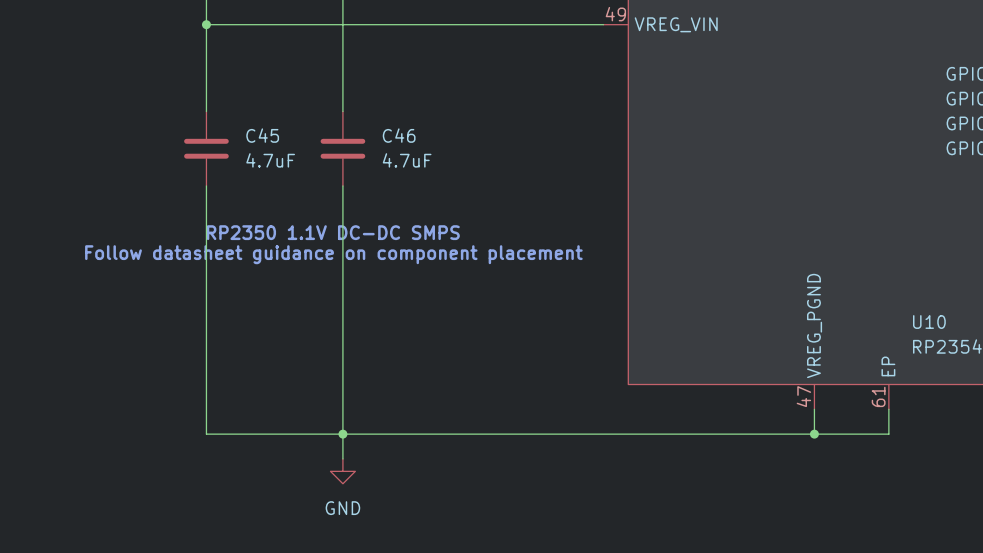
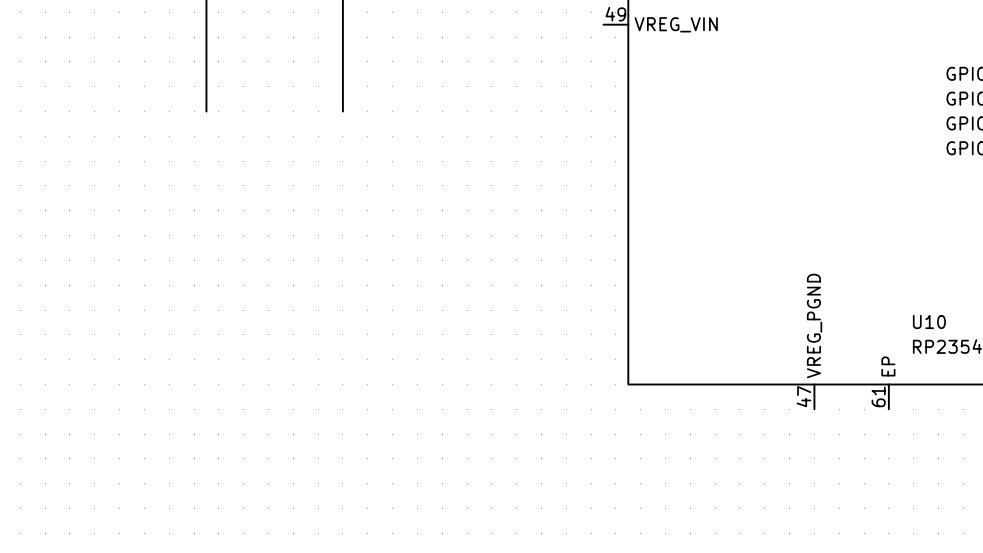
wire: (206, 24) (603, 24) -> none
junction: (206, 24) -> none
C45: 4.7uF (206, 148) -> none
C46: 4.7uF (342, 148) -> none
wire: (206, 185) (206, 434) (888, 434) (888, 409) -> none
wire: (342, 185) (342, 458) -> none
text: RP2350 1.1V DC-DC SMPS (333, 232) -> none
text: Follow datasheet guidance on component placement (333, 254) -> none
wire: (814, 409) (814, 434) -> none
junction: (342, 434) -> none
junction: (814, 434) -> none
power symbol: GND (342, 471) -> none

